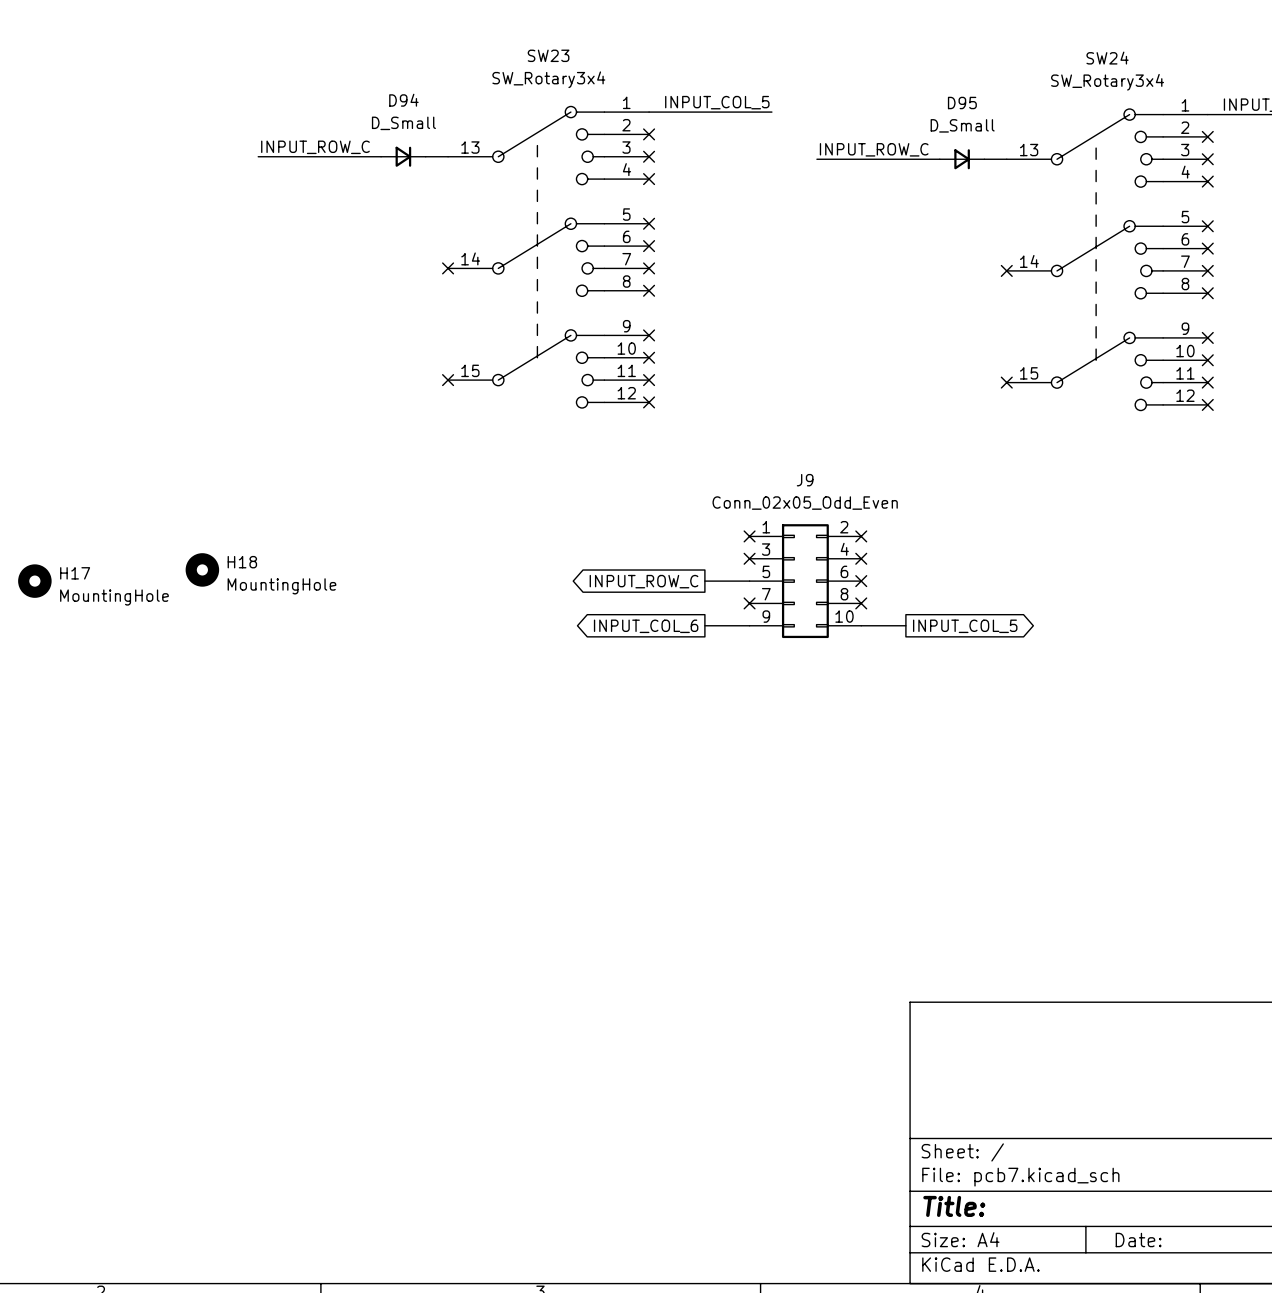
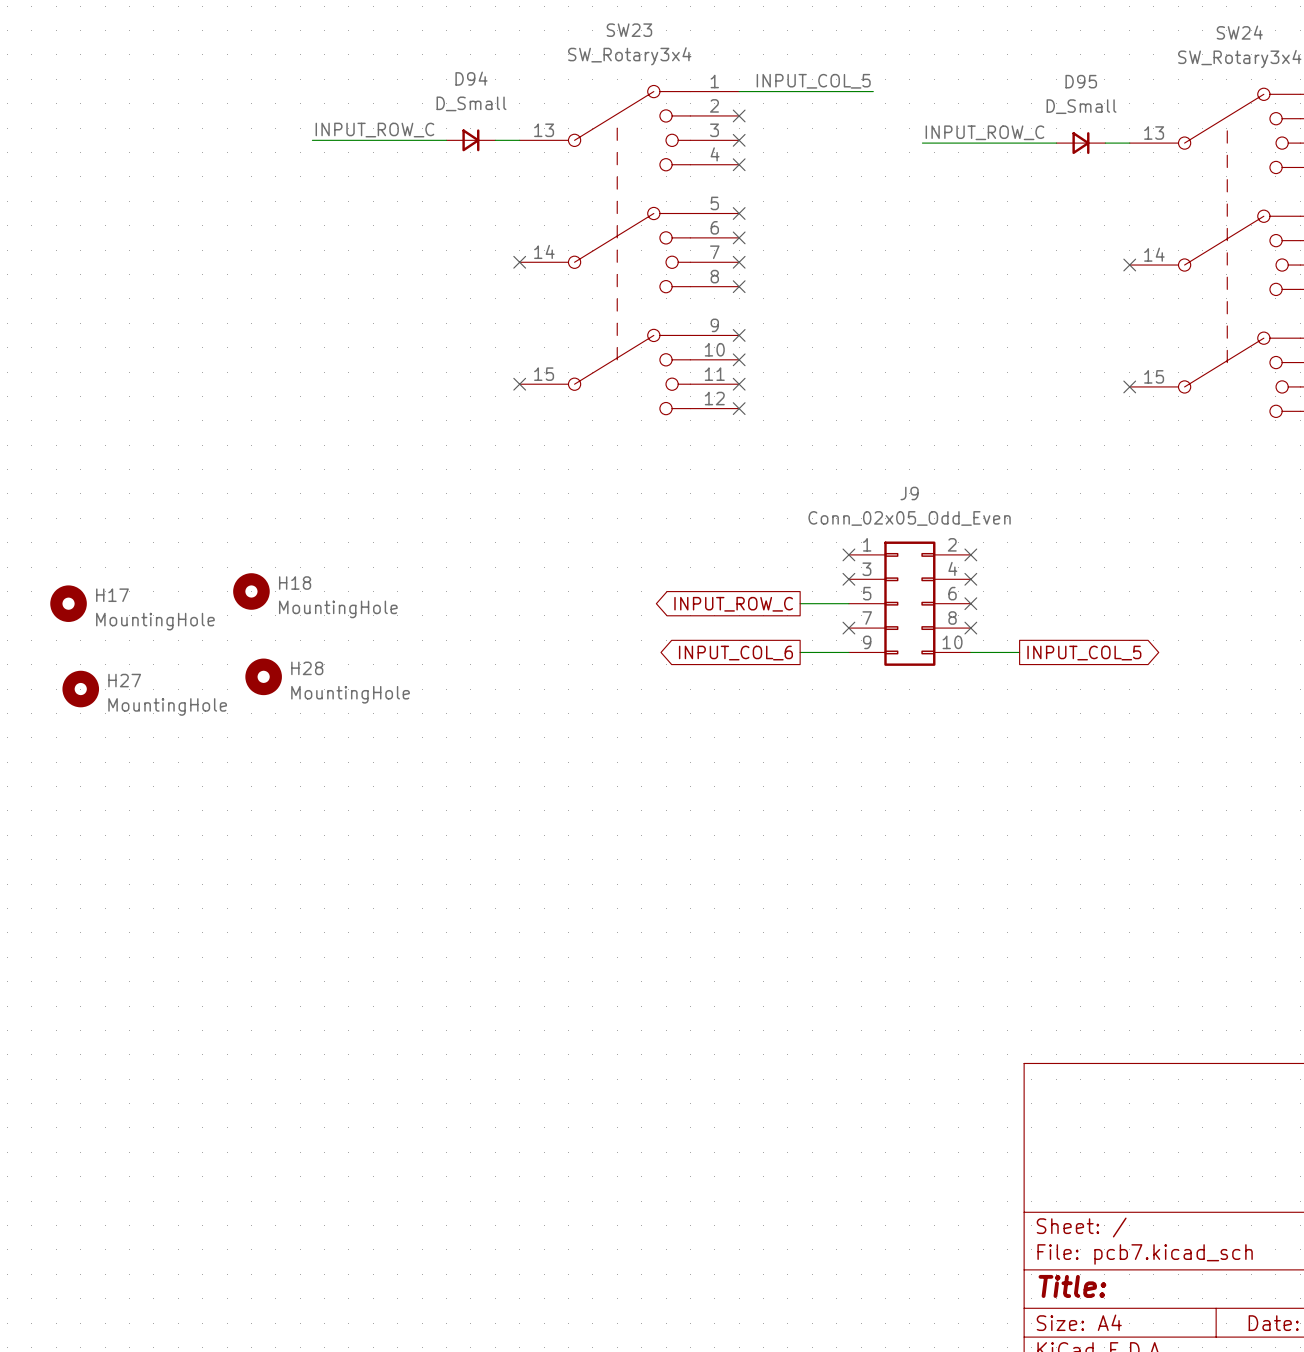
H28: none -> MountingHole (263, 676)
H27: none -> MountingHole (80, 689)

